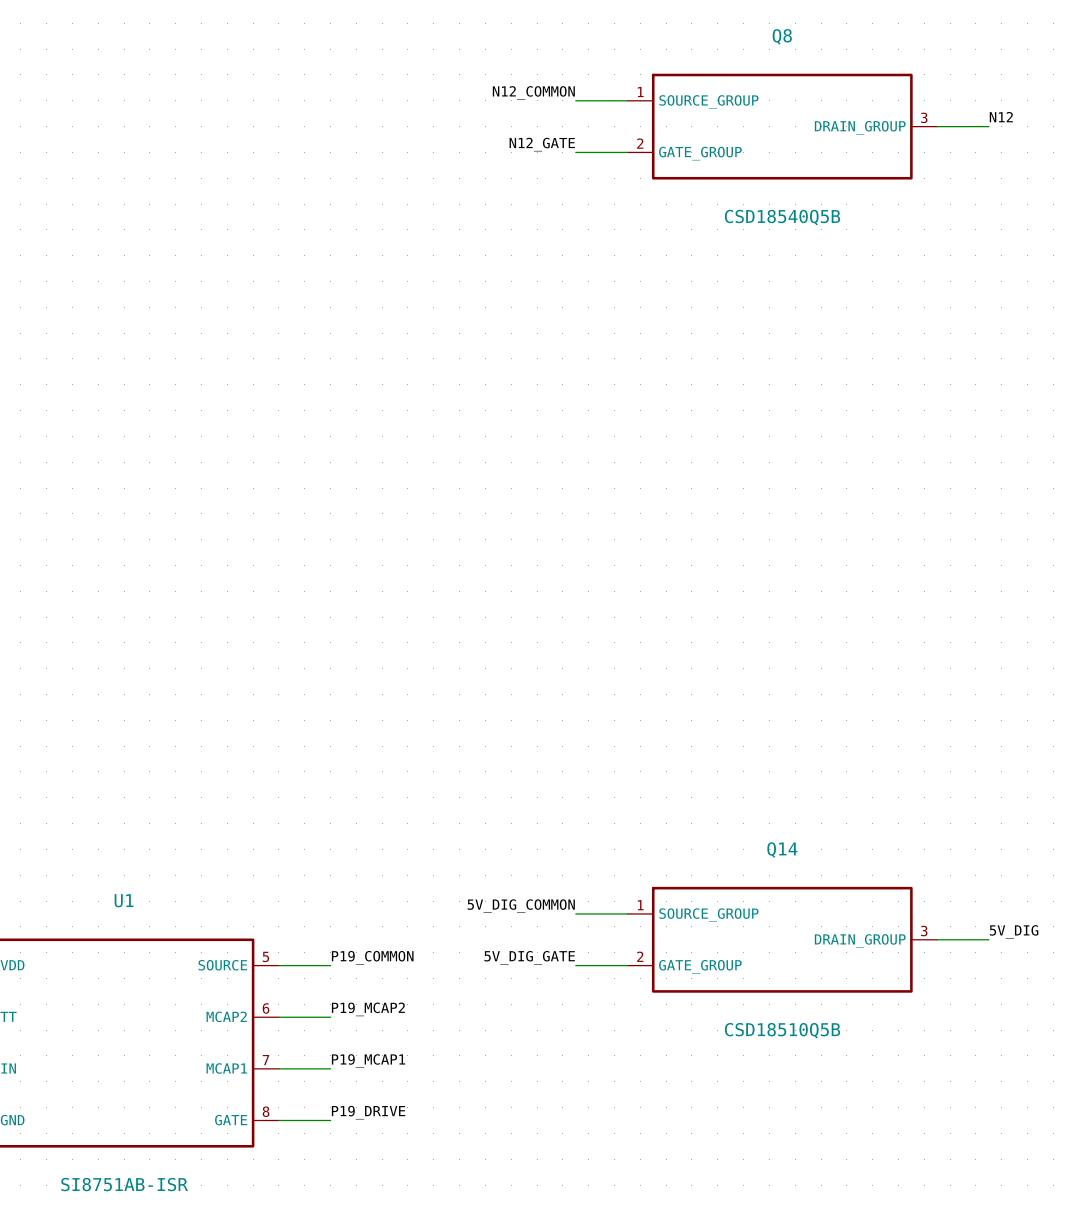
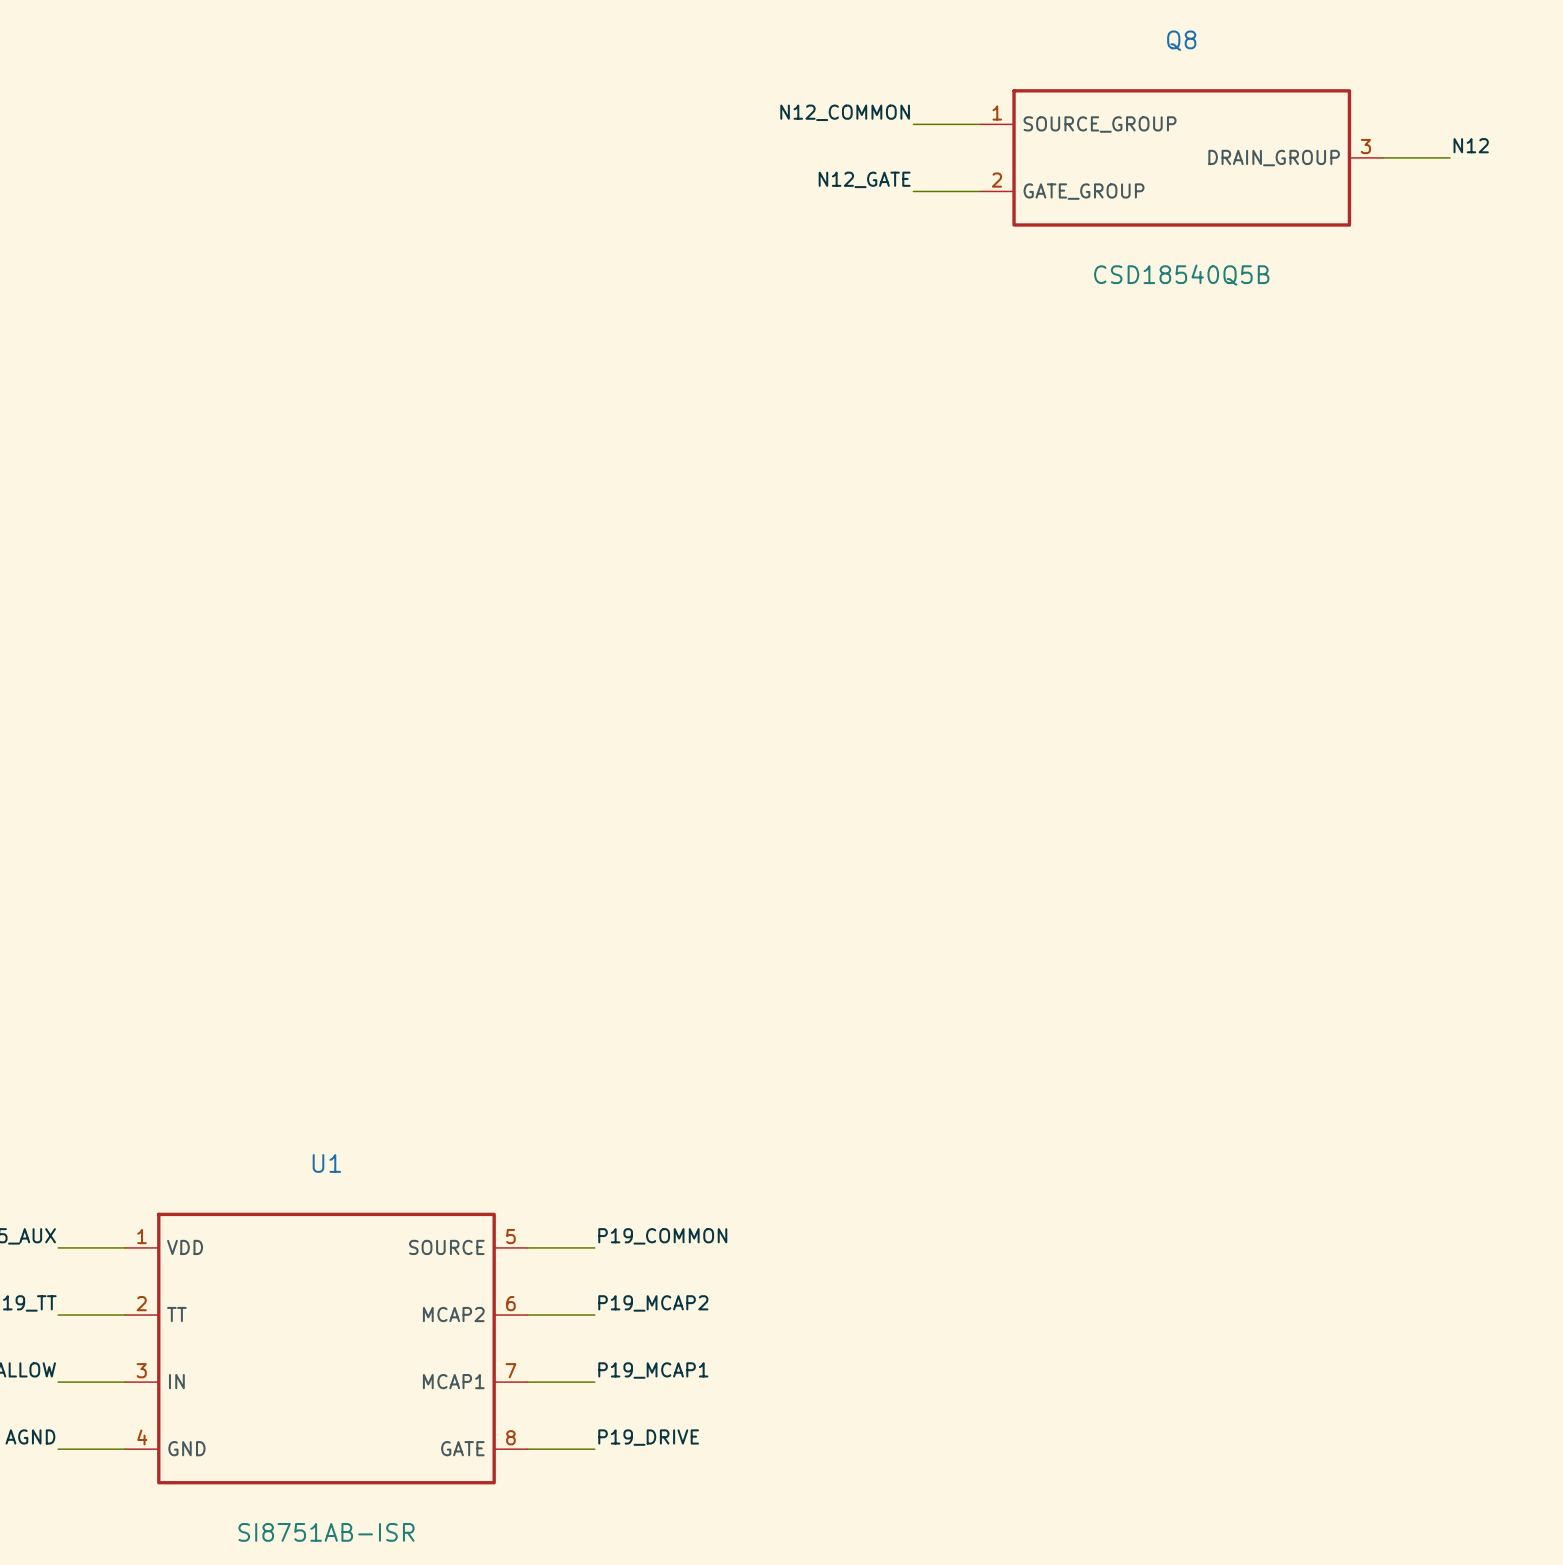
label: 5V_DIG_COMMON (521, 906) -> none
wire: (575, 913) (627, 913) -> none
label: 5V_DIG (1014, 931) -> none
Q14: CSD18510Q5B (782, 939) -> none
wire: (937, 939) (988, 939) -> none
label: 5V_DIG_GATE (529, 957) -> none
wire: (575, 965) (627, 965) -> none

